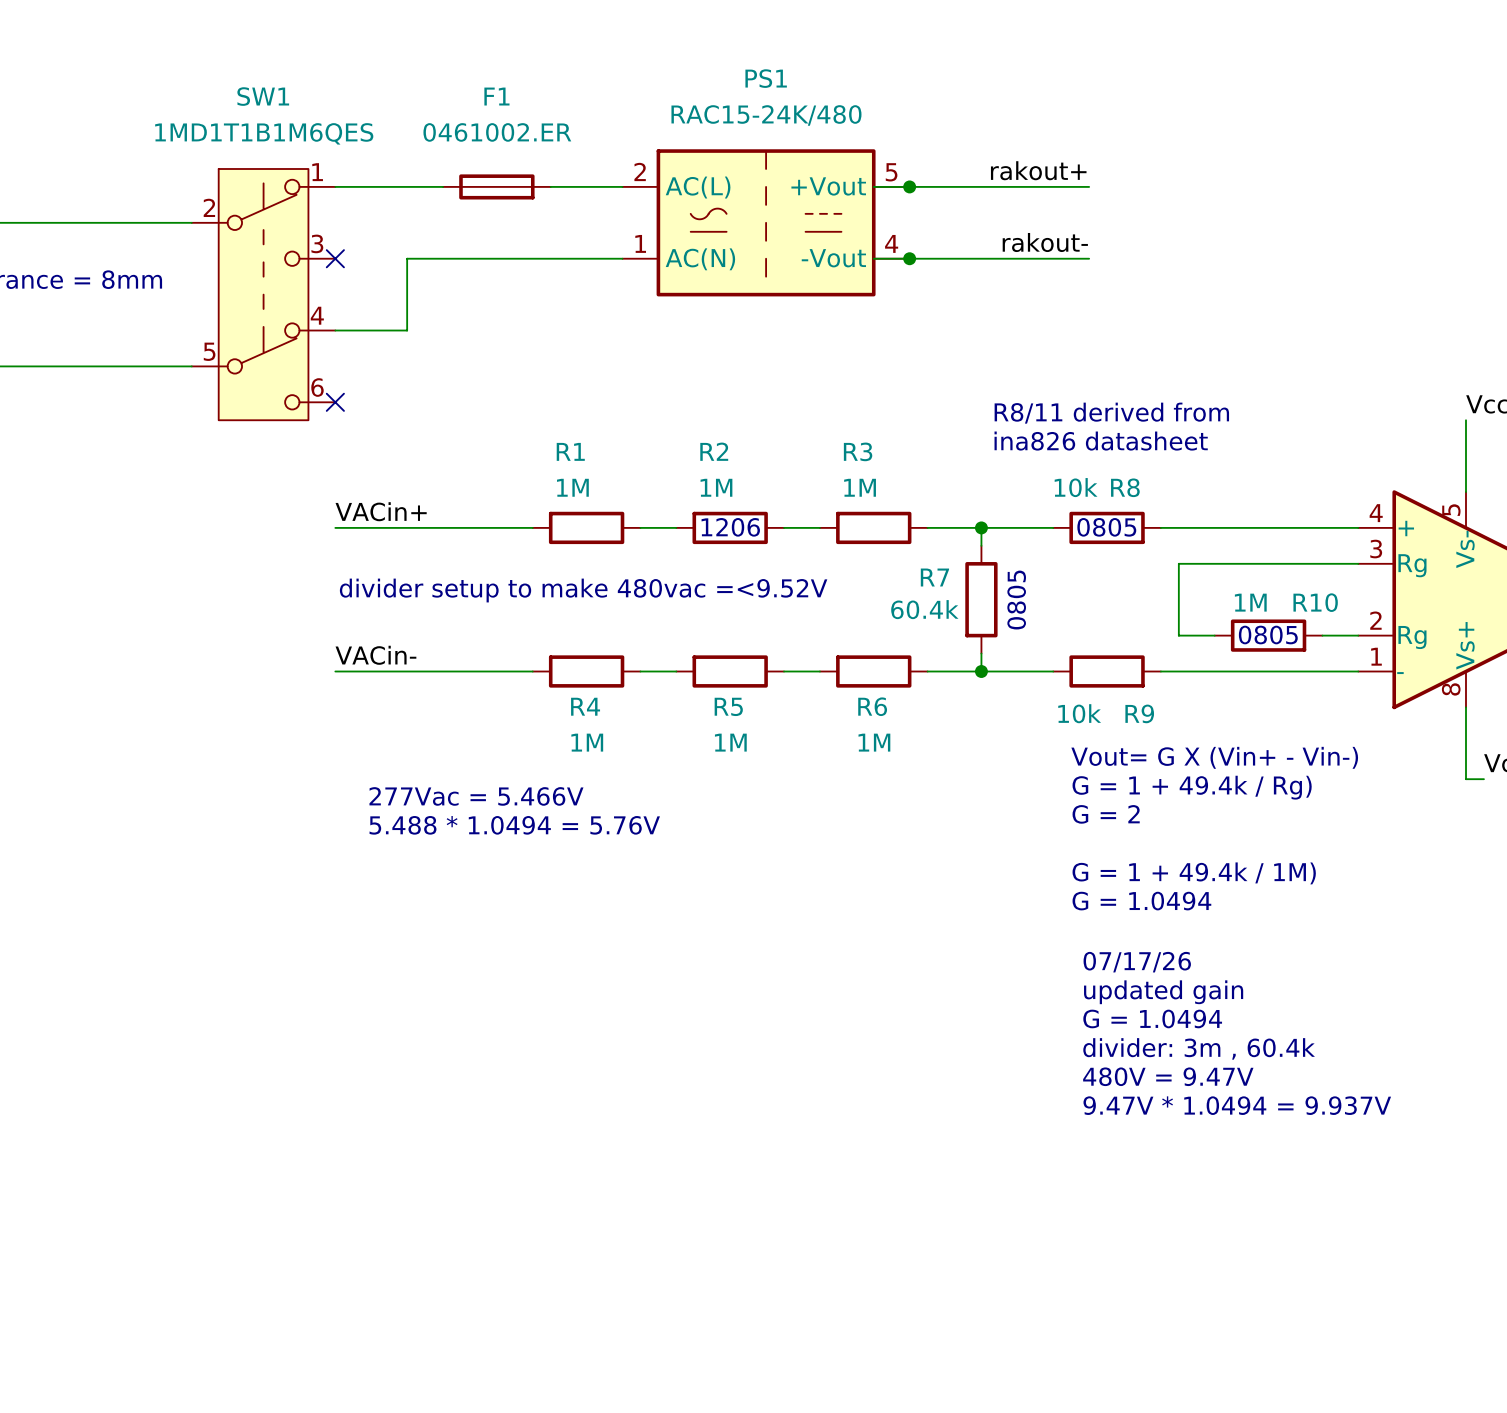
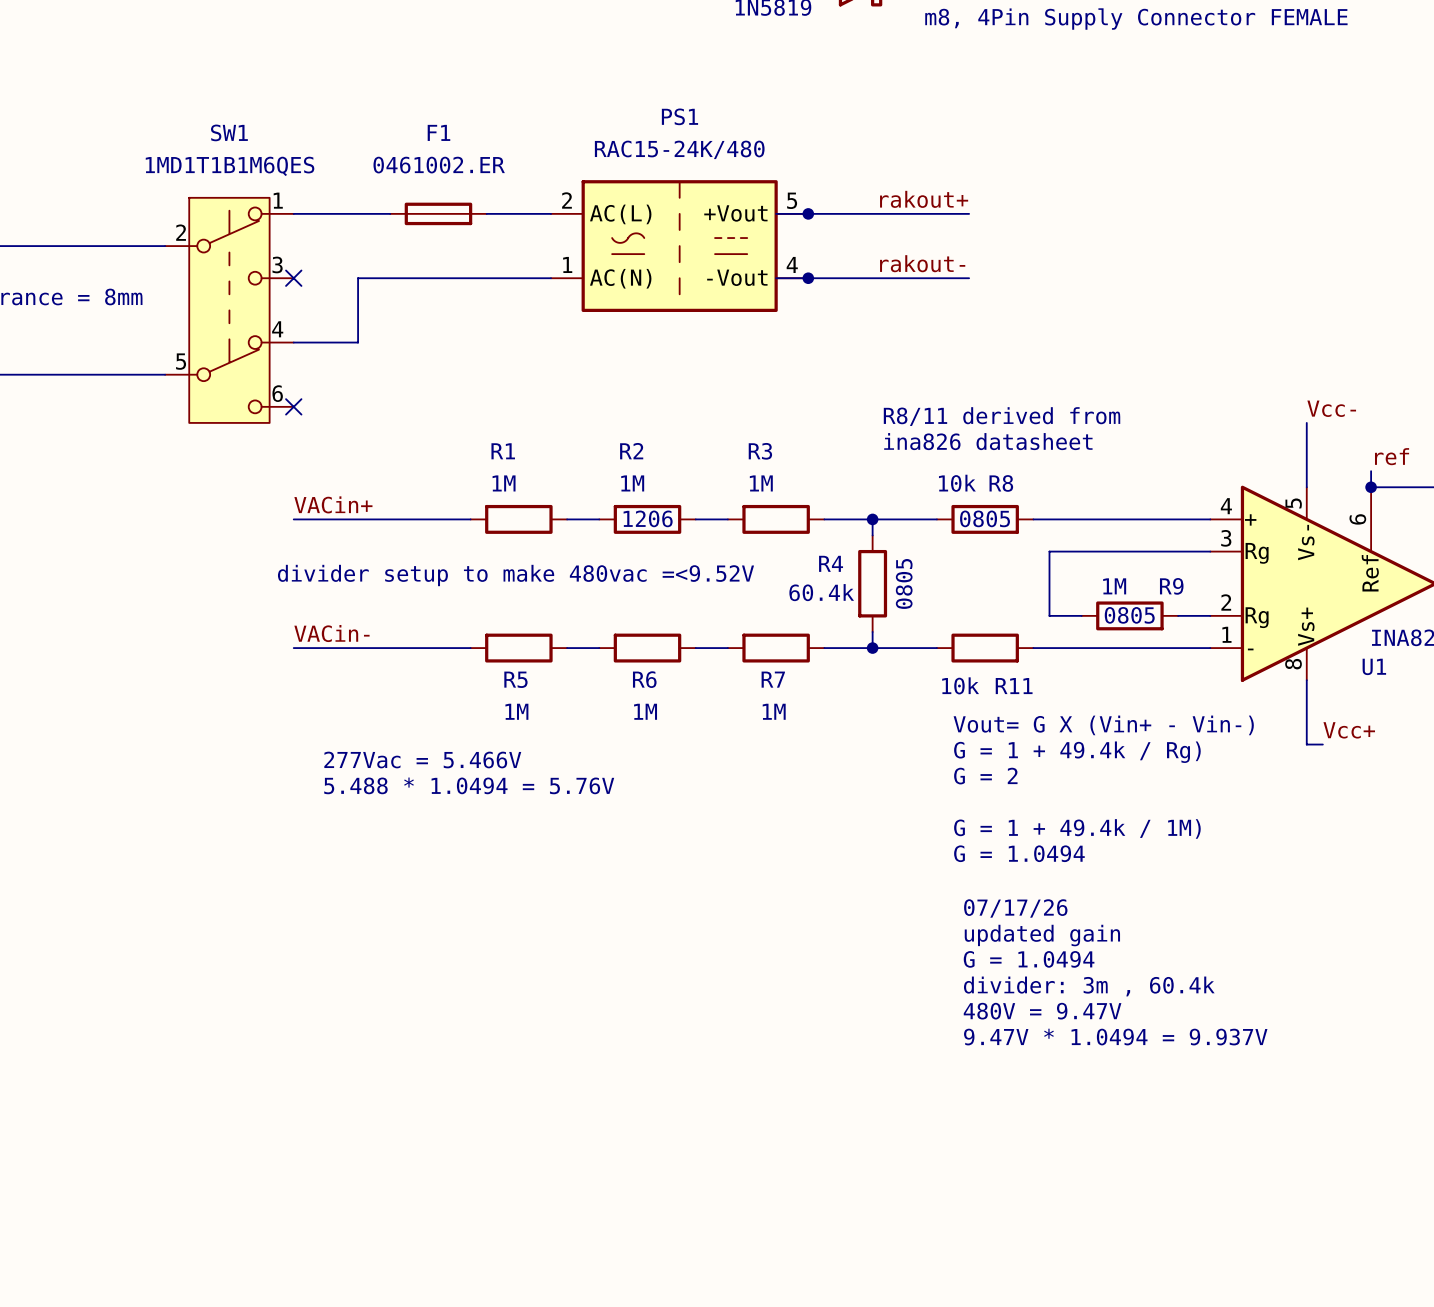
R7 name: R7 (934, 577) -> R4 (831, 563)
R10 name: R10 (1315, 602) -> R9 (1171, 586)
R4 name: R4 (585, 706) -> R5 (515, 679)
R5 name: R5 (728, 706) -> R6 (644, 679)
R6 name: R6 (872, 706) -> R7 (773, 679)
R9 name: R9 (1139, 713) -> R11 (1014, 686)

